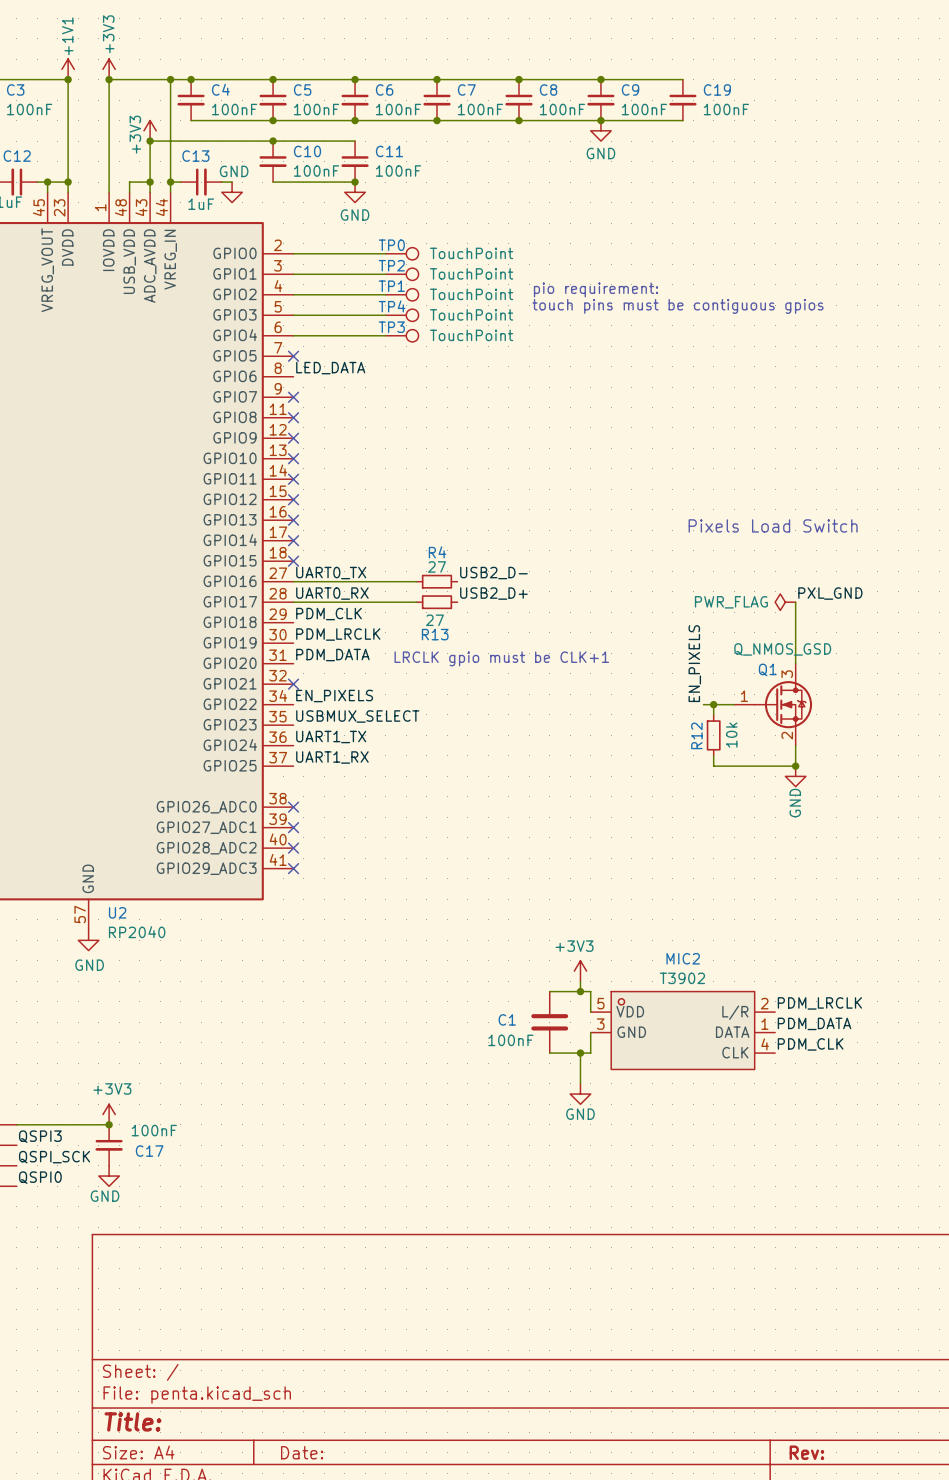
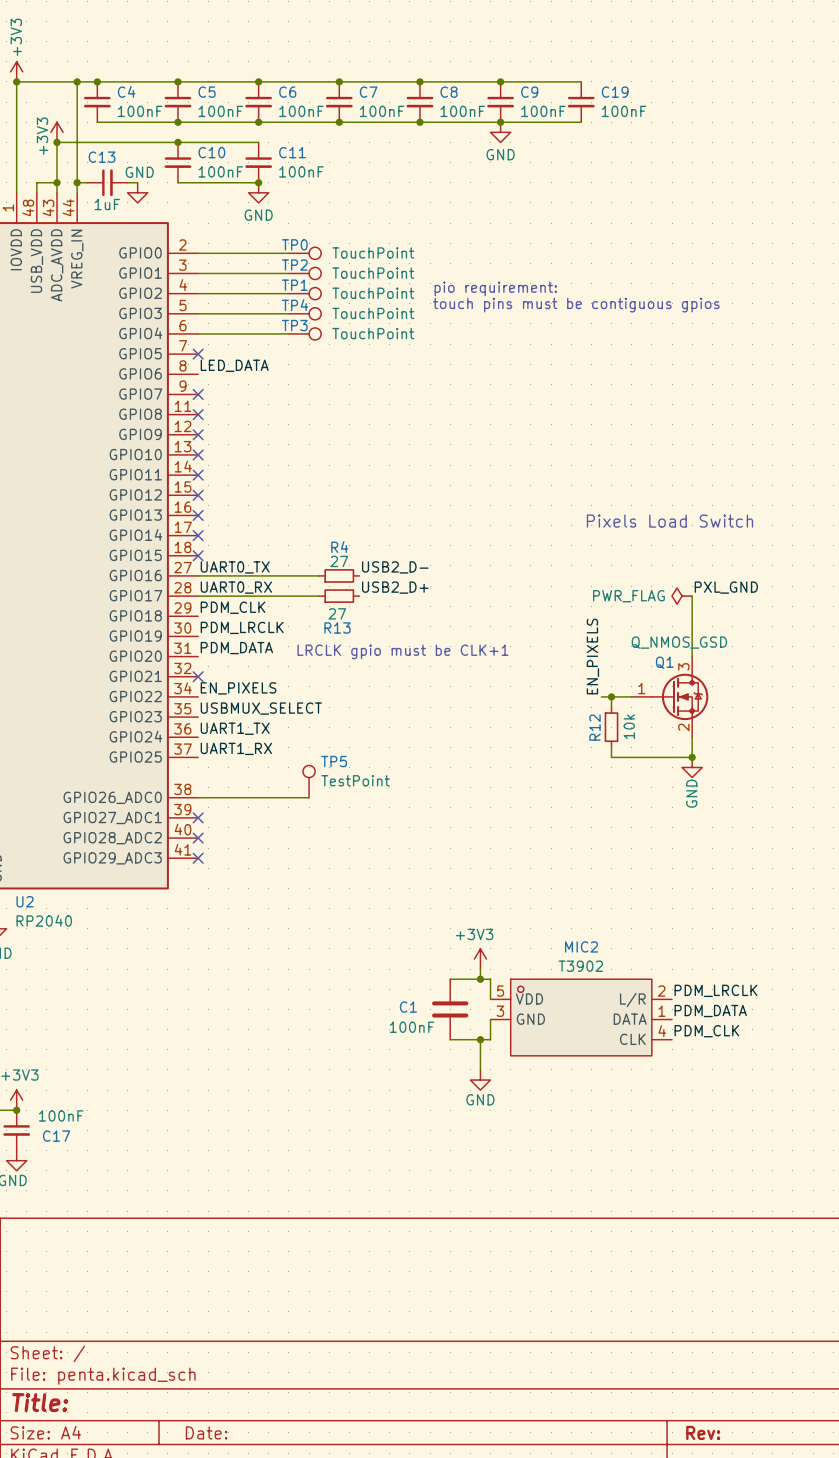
TP5: none -> TestPoint (309, 781)
wire: none -> (198, 797) (309, 797)
no-connect mark: (293, 807) -> none

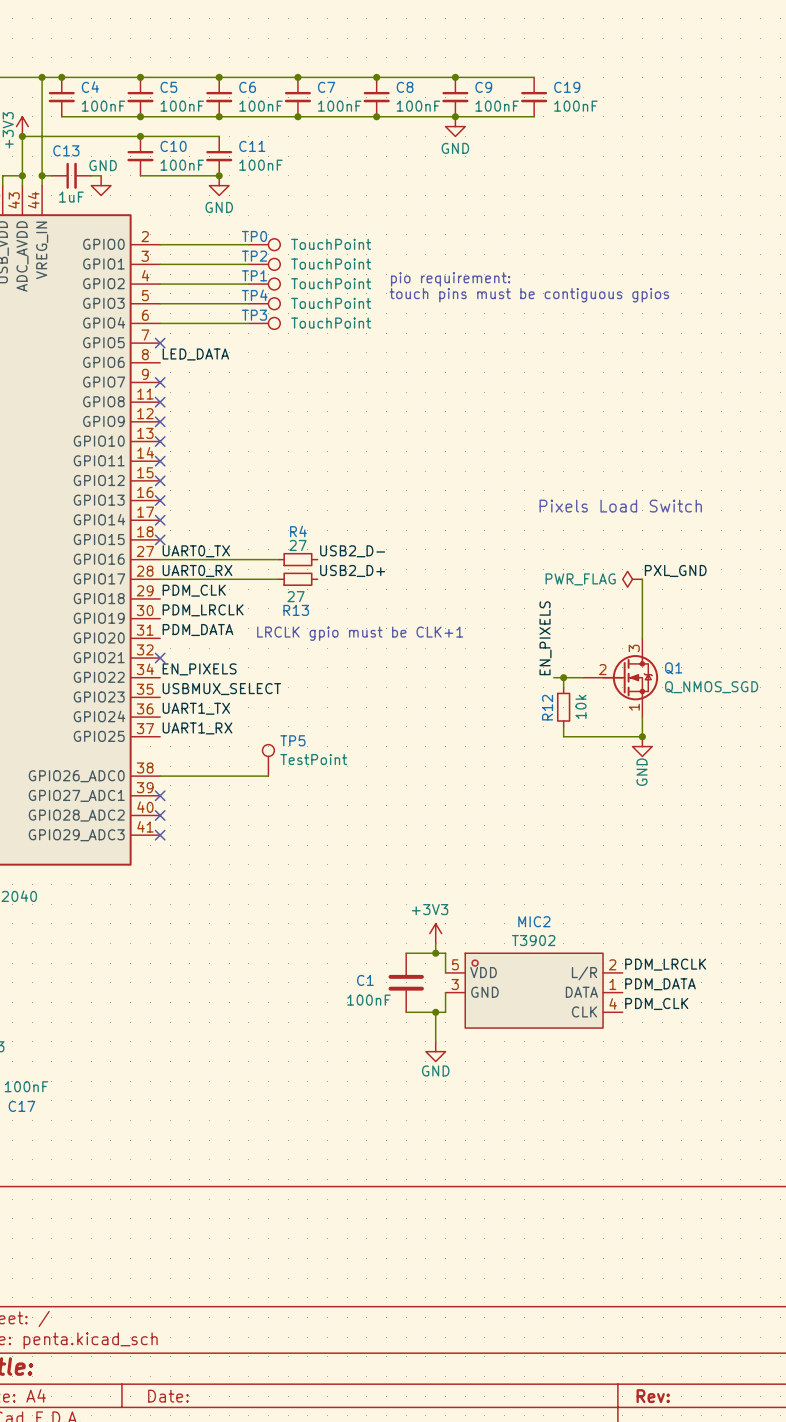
Q1 value: Q_NMOS_GSD (679, 642) -> Q_NMOS_SGD (711, 687)
Q1 symbol: [631, 656, 709, 738] -> [583, 638, 659, 718]
Q1 name position: Q1 (664, 662) -> Q1 (673, 668)

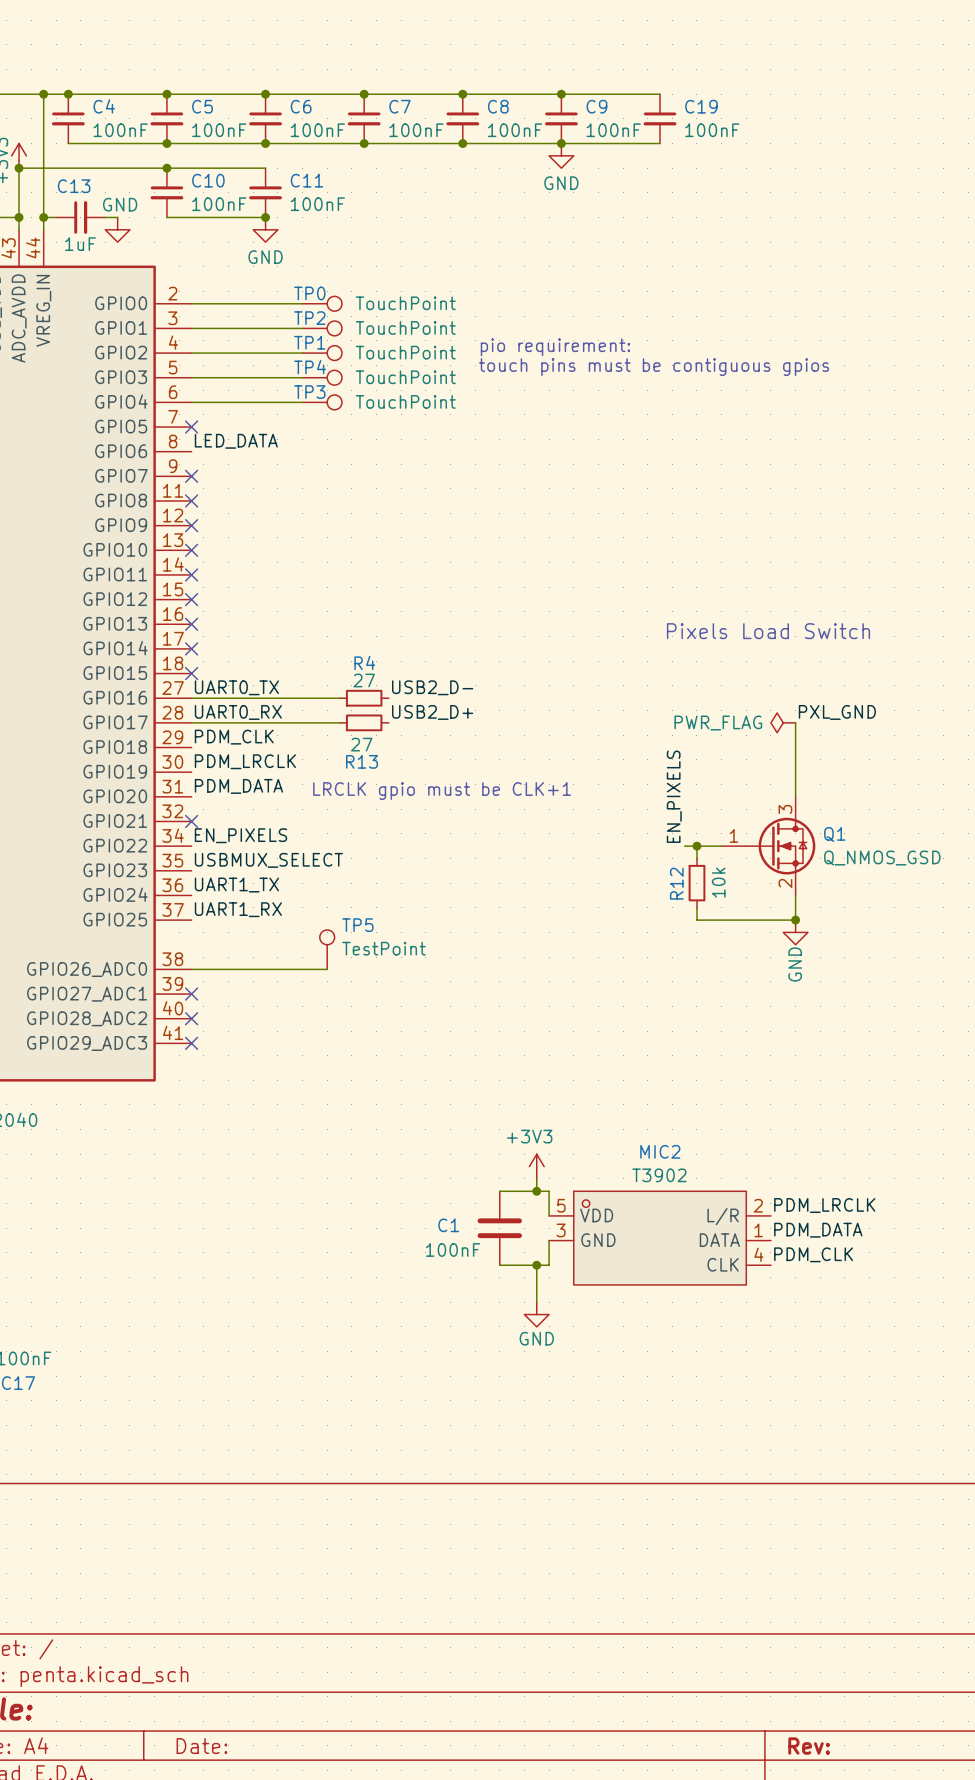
Q1 symbol: [583, 638, 659, 718] -> [721, 796, 816, 896]
Q1 value: Q_NMOS_SGD (711, 687) -> Q_NMOS_GSD (882, 858)

